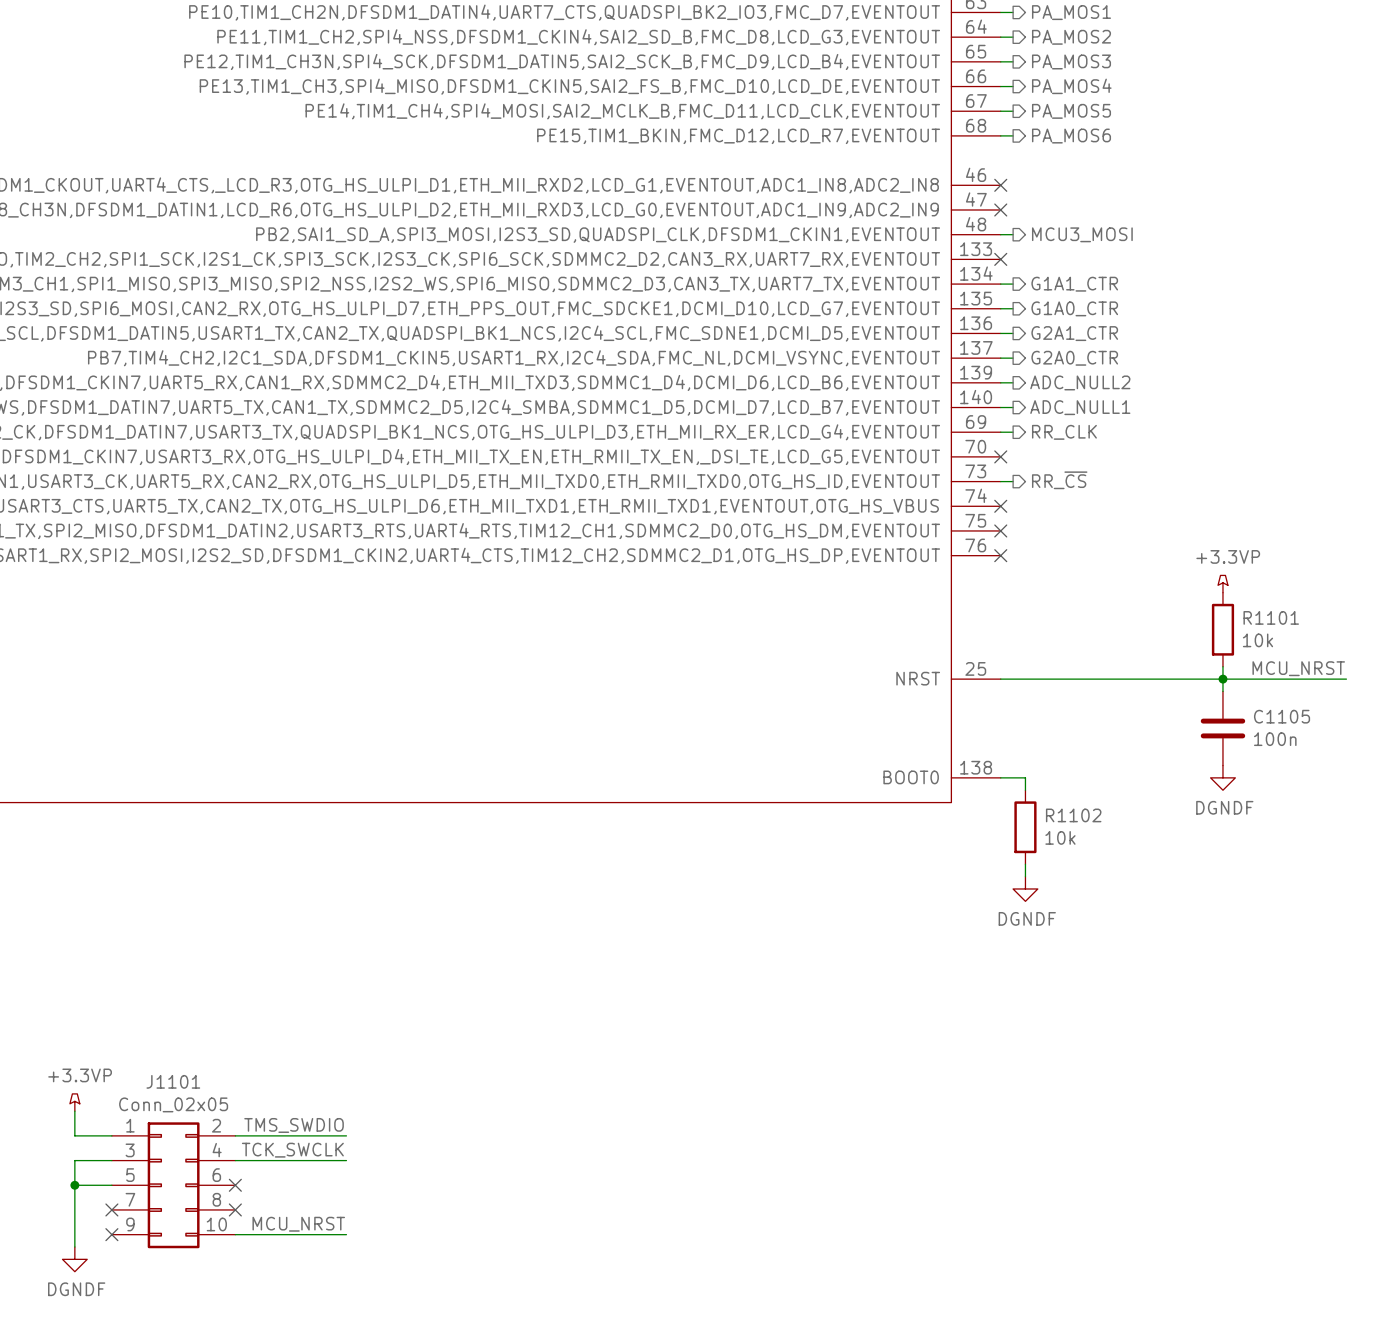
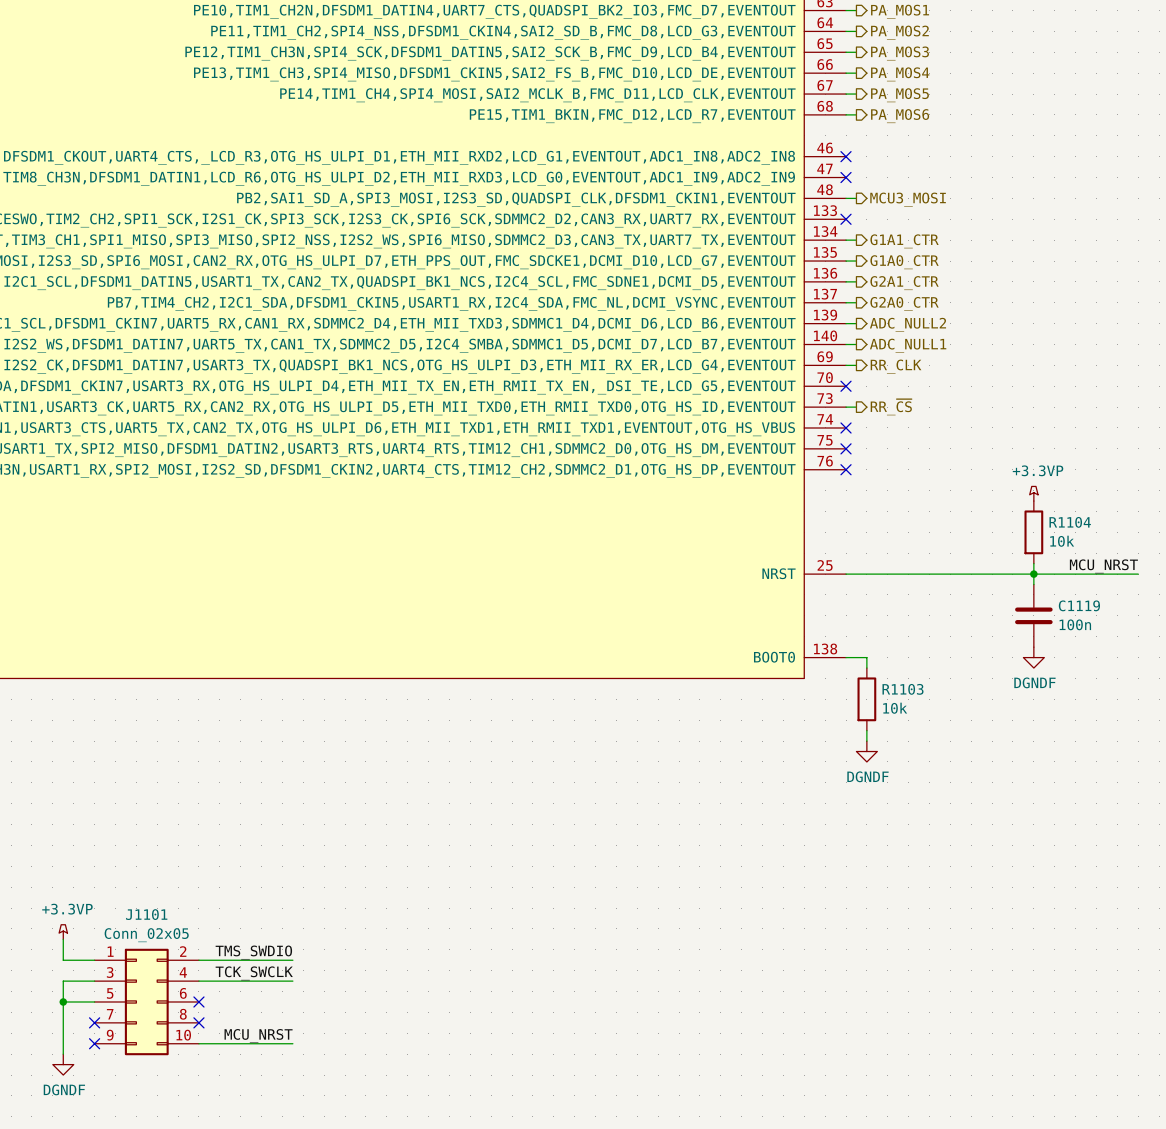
R1101 name: R1101 (1271, 617) -> R1104 (1070, 522)
C1105 name: C1105 (1282, 716) -> C1119 (1079, 605)
R1102 name: R1102 (1073, 815) -> R1103 (903, 689)

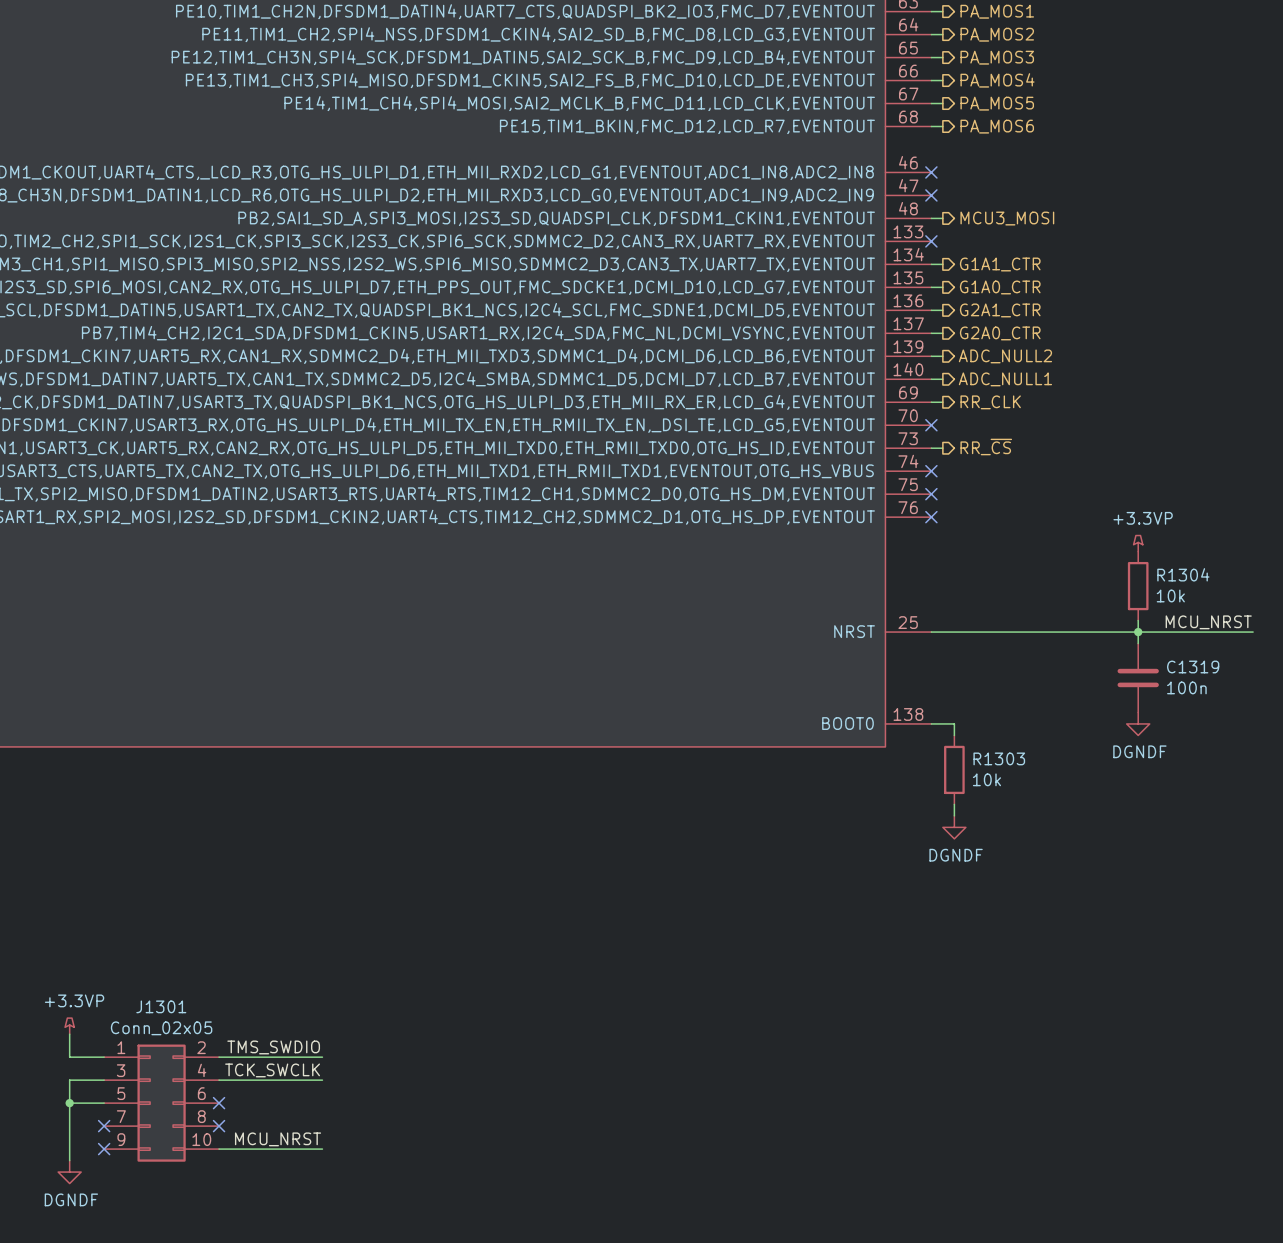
R1104 name: R1104 (1070, 522) -> R1304 (1183, 574)
C1119 name: C1119 (1079, 605) -> C1319 (1193, 667)
R1103 name: R1103 (903, 689) -> R1303 (999, 758)
J1101 name: J1101 (146, 914) -> J1301 (161, 1006)

